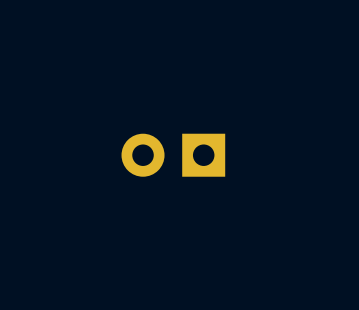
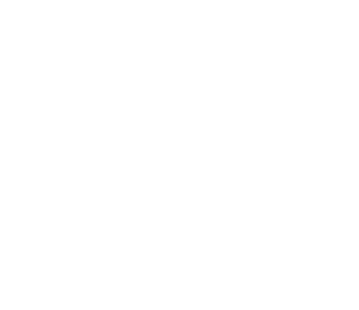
part: (173, 155) -> none

